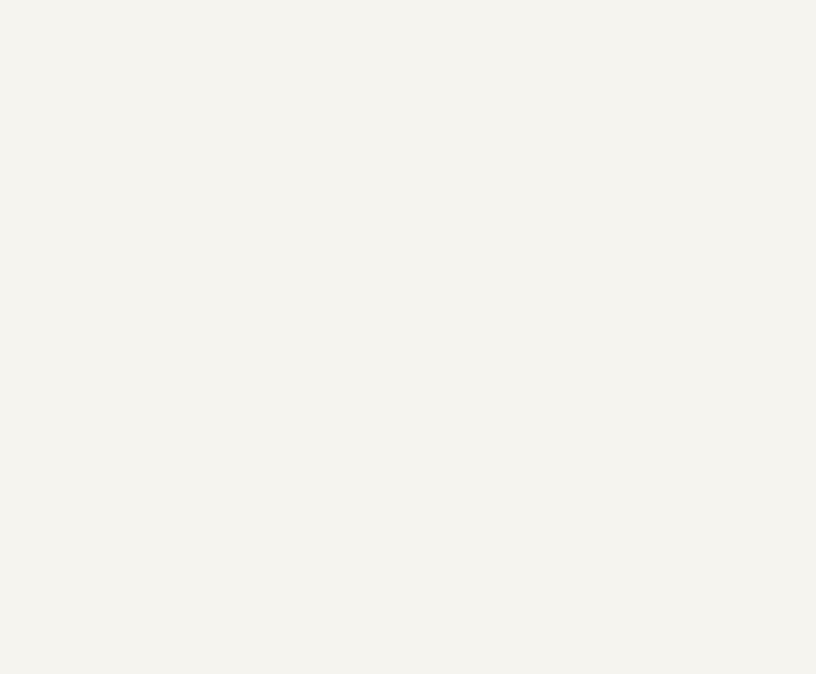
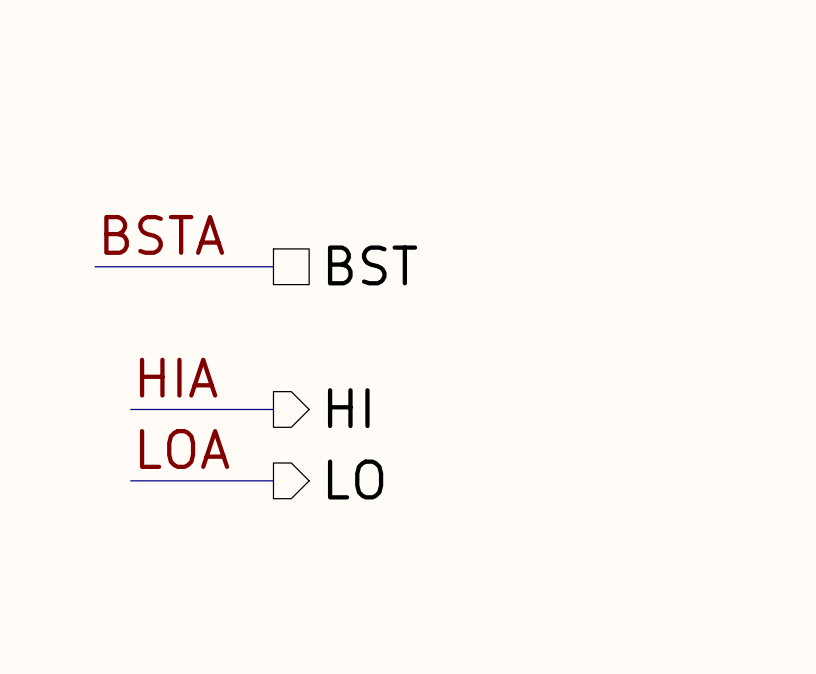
label: none -> BSTA (164, 234)
sheet pin: none -> BST (372, 265)
wire: none -> (95, 266) (273, 266)
label: none -> HIA (178, 377)
sheet pin: none -> HI (348, 408)
wire: none -> (130, 409) (273, 409)
label: none -> LOA (184, 449)
sheet pin: none -> LO (355, 479)
wire: none -> (130, 480) (273, 480)

